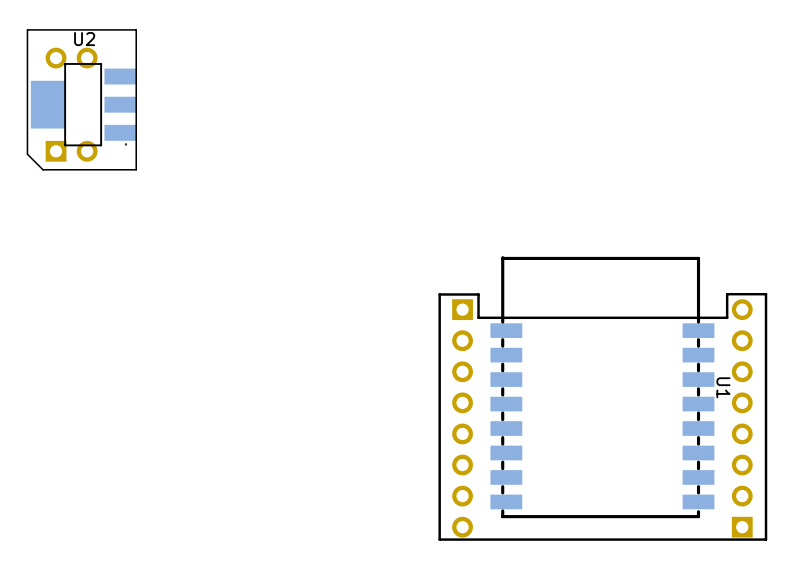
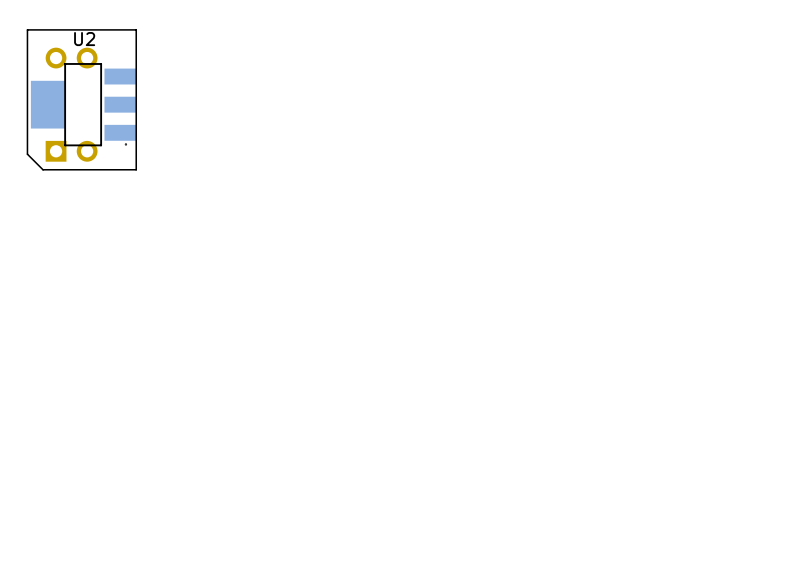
board edge: (766, 294) (766, 539) (439, 539) (439, 294) (478, 294) (478, 317) (727, 317) (727, 294) (766, 294) -> none
U1: (602, 387) -> none
part: (462, 418) -> none
part: (742, 418) -> none

